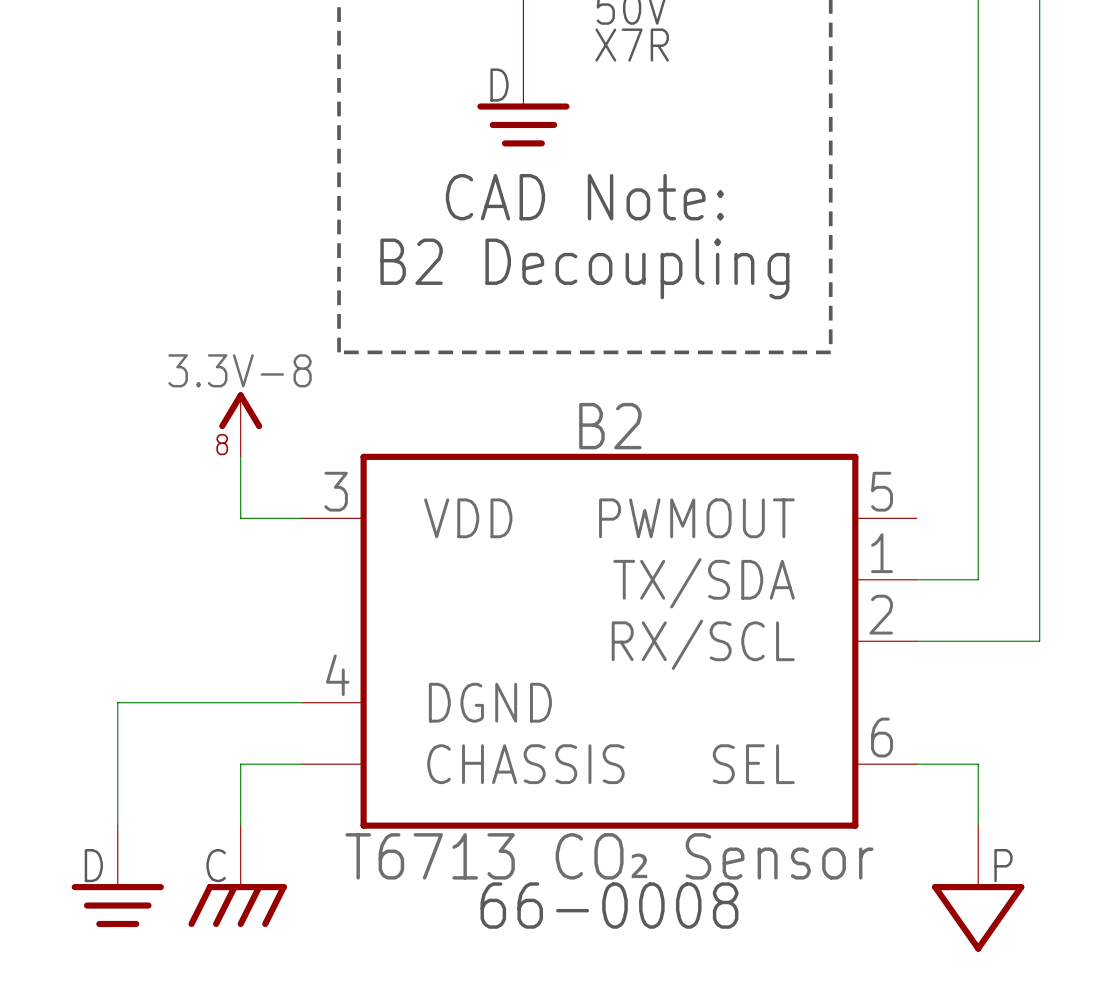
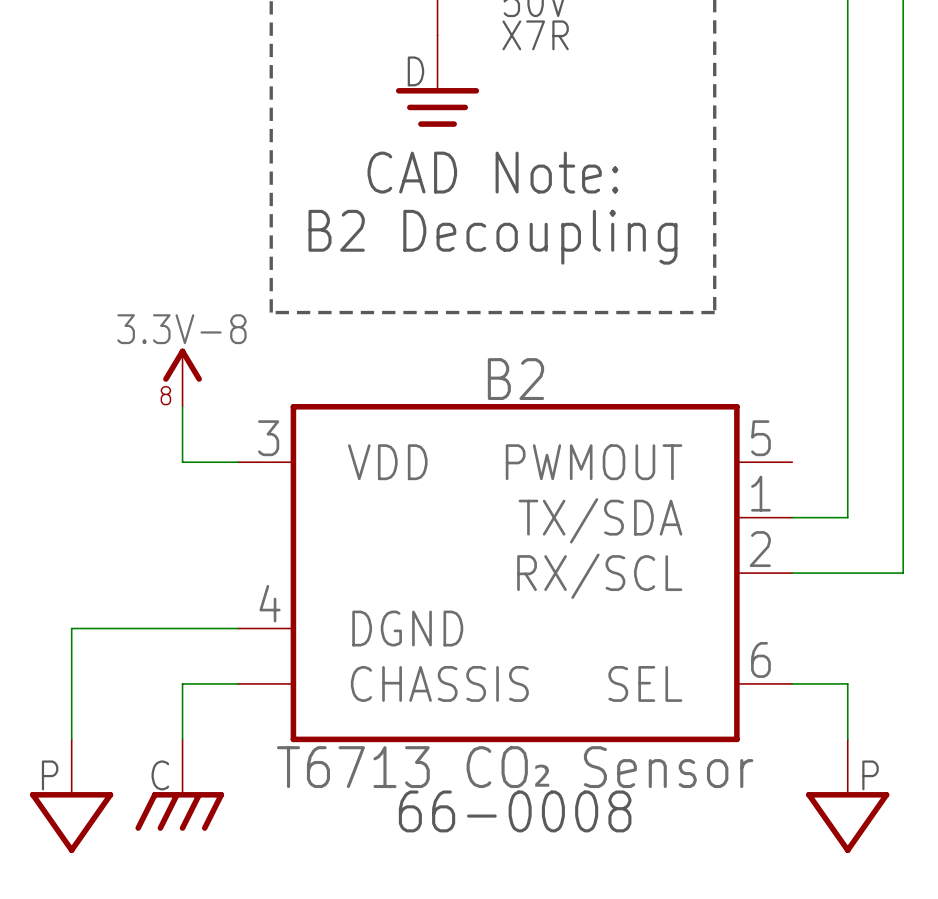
power symbol shape: [71, 825, 164, 928] -> [30, 739, 114, 854]

